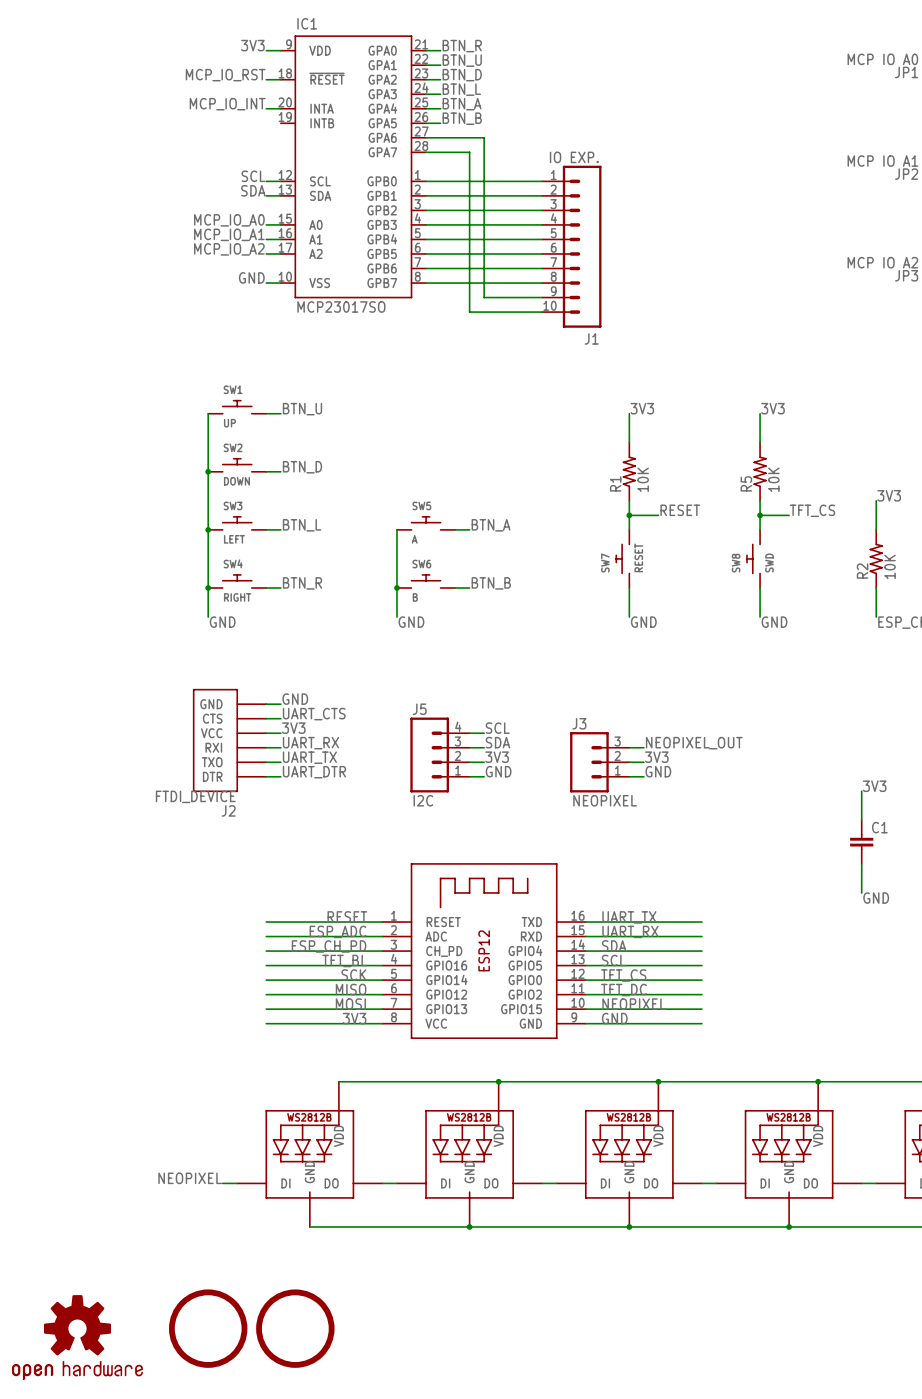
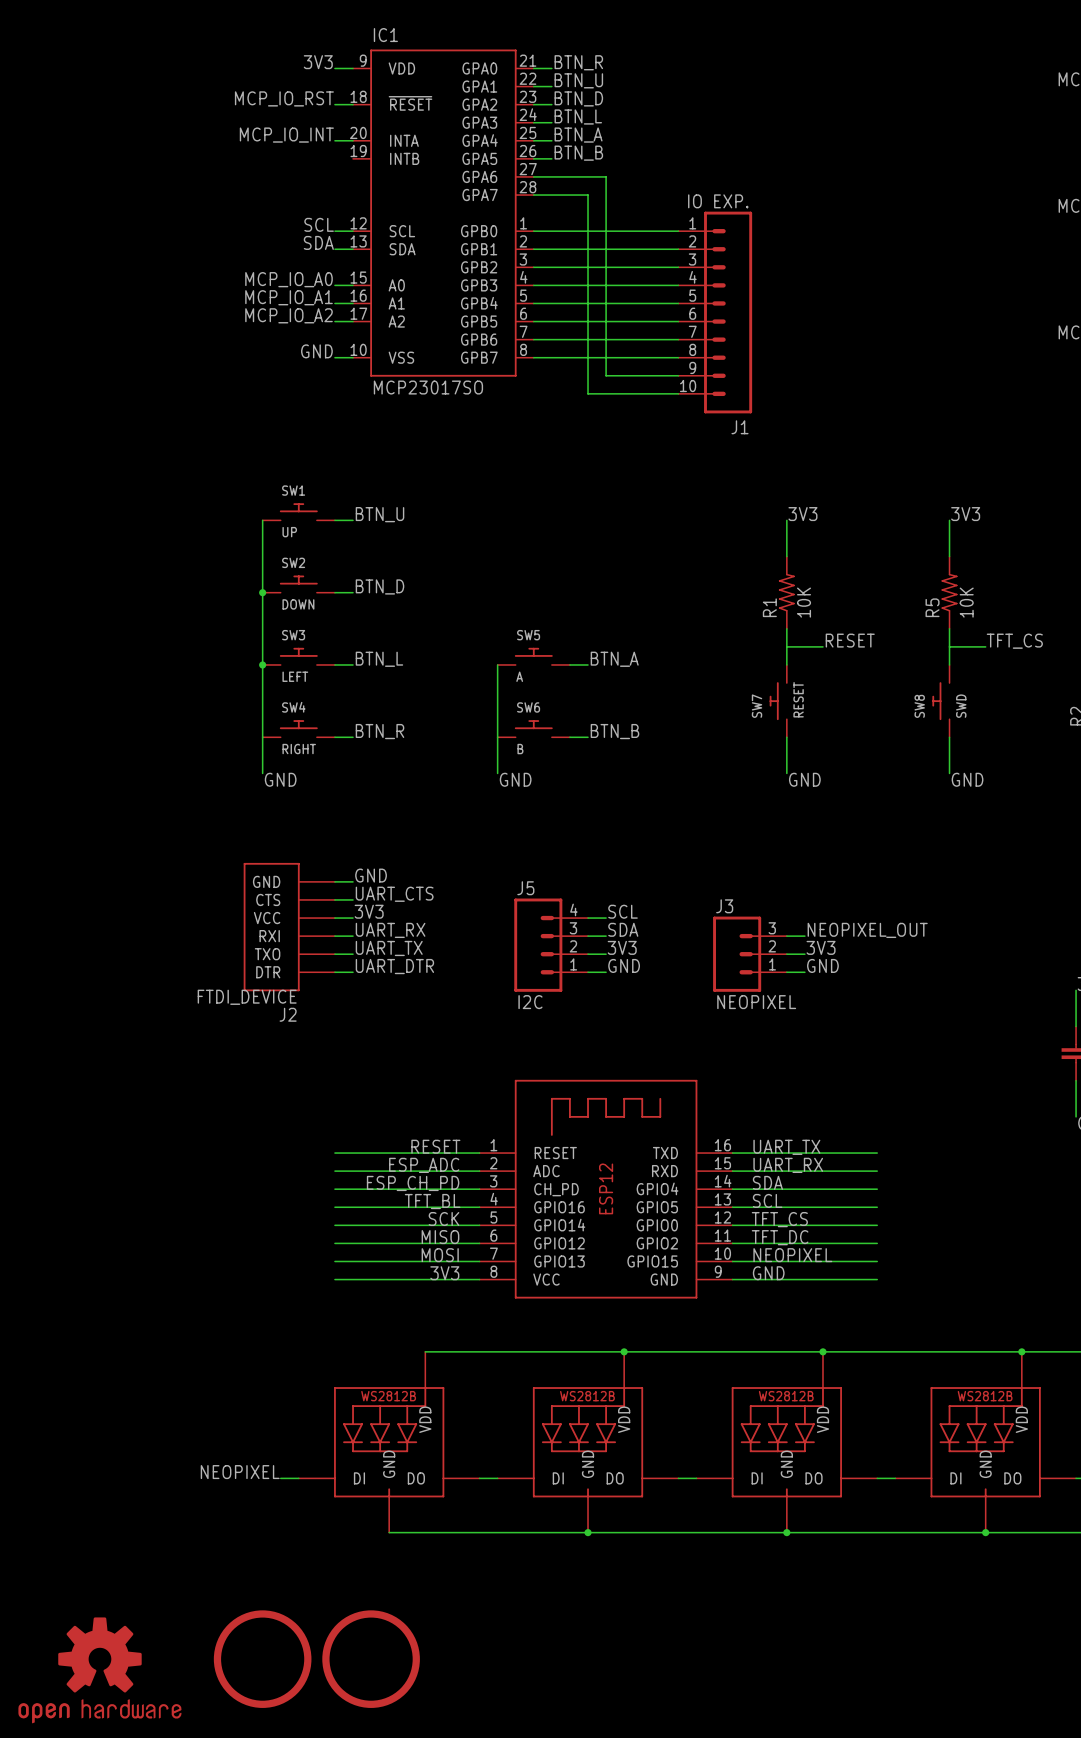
junction: (629, 515) -> none
junction: (760, 515) -> none
junction: (208, 588) -> none
junction: (396, 588) -> none

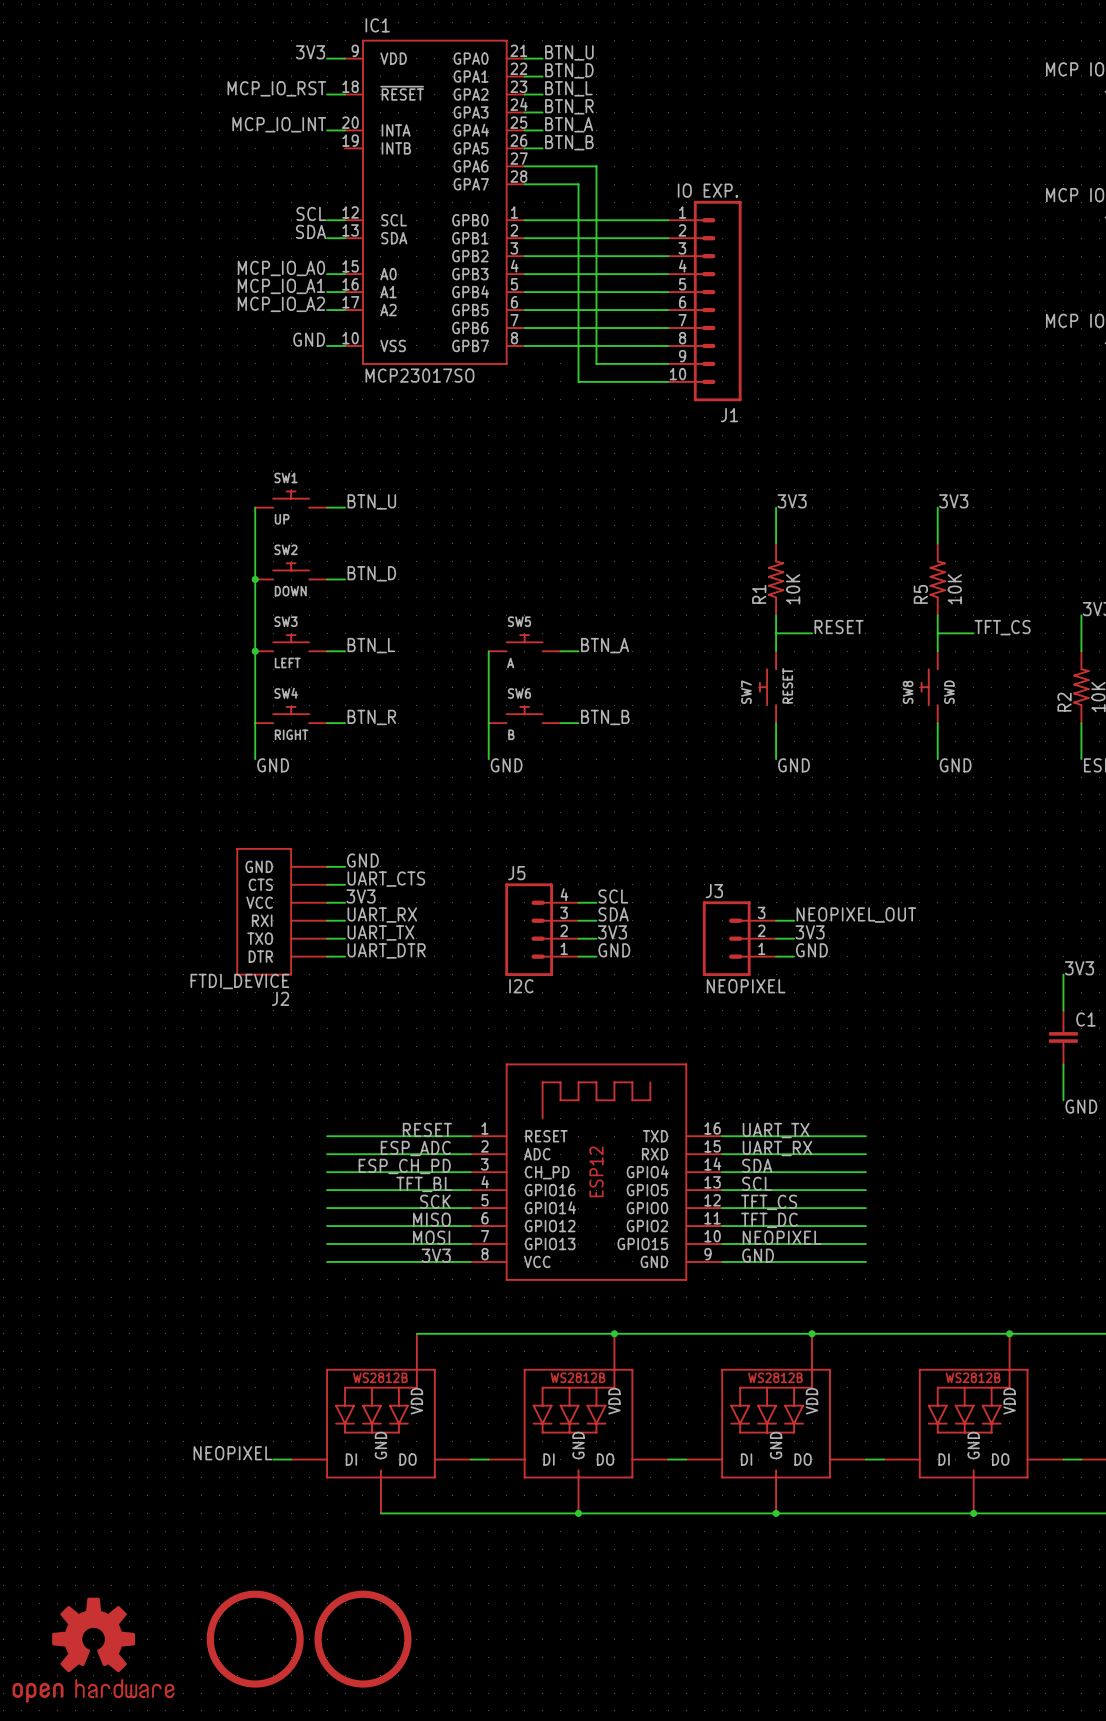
label: BTN_R (578, 62) -> BTN_U (569, 52)
label: BTN_U (578, 80) -> BTN_D (569, 70)
label: BTN_D (578, 98) -> BTN_L (568, 88)
label: BTN_L (578, 116) -> BTN_R (569, 106)

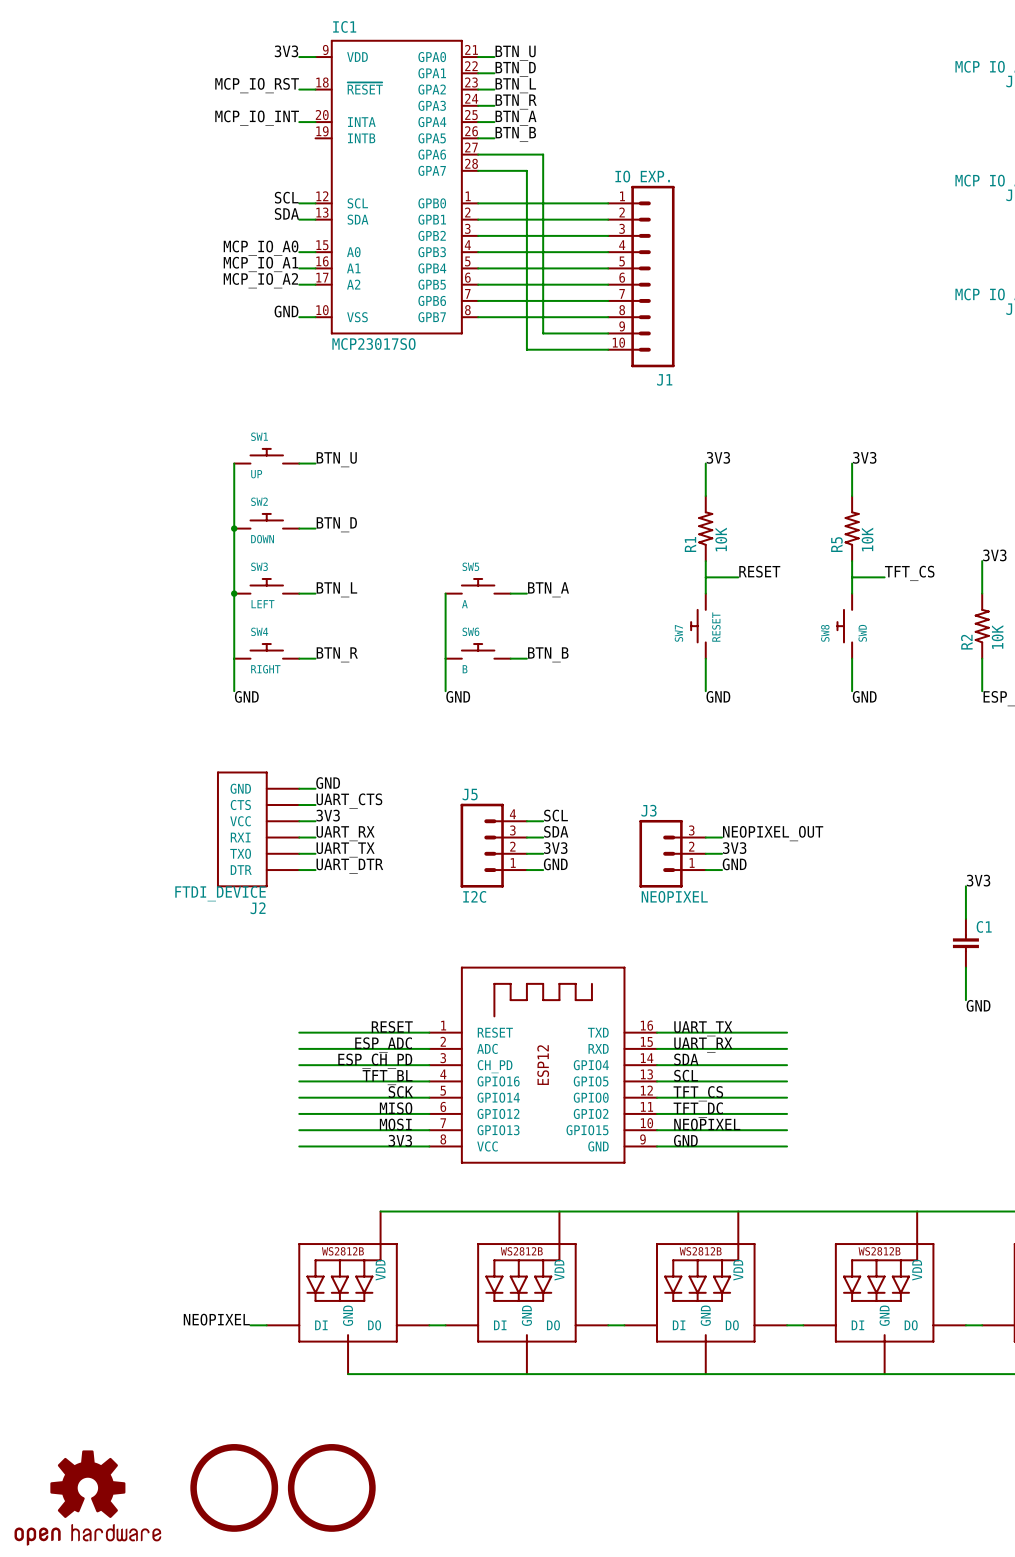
junction: (614, 1333) -> none
junction: (812, 1333) -> none
junction: (1009, 1333) -> none
junction: (578, 1513) -> none
junction: (776, 1513) -> none
junction: (973, 1513) -> none

